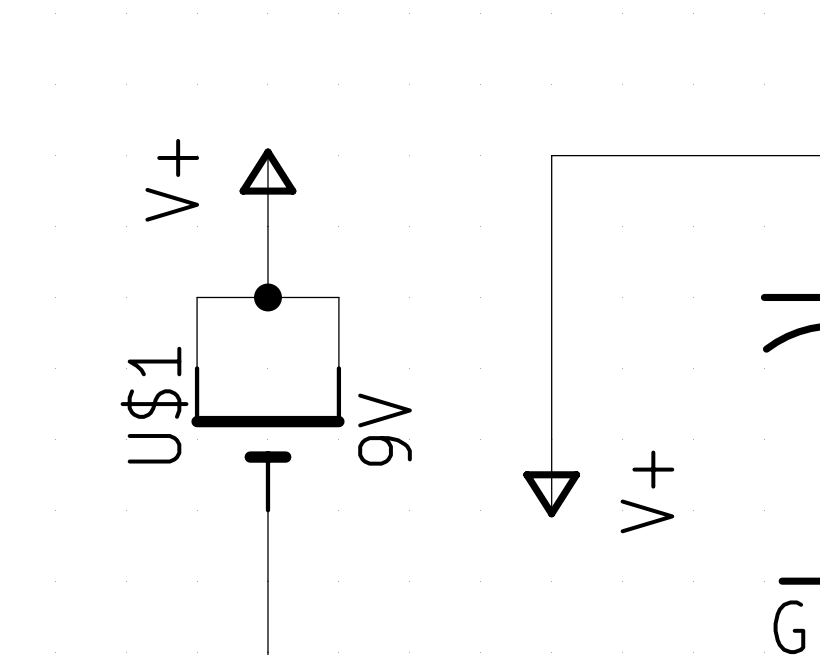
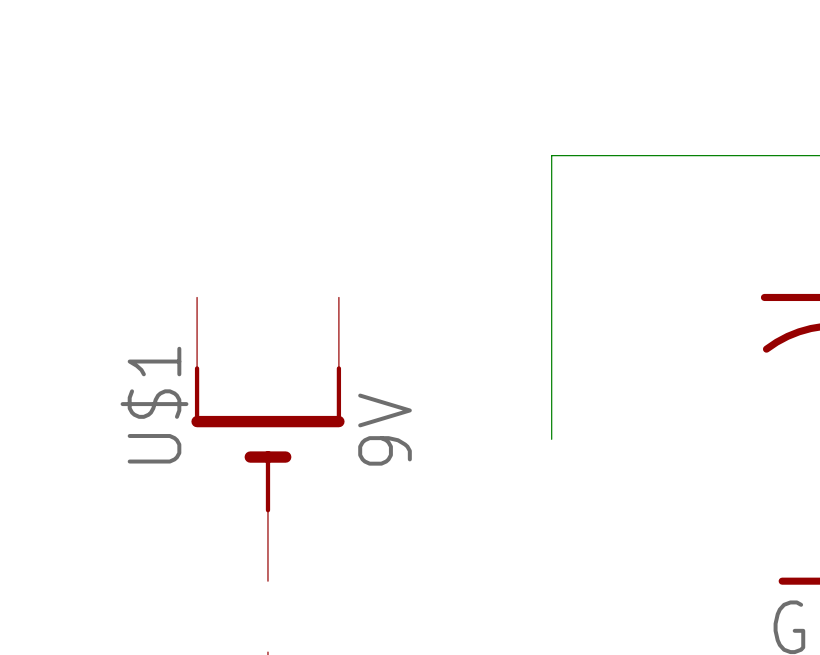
power symbol: V+ (267, 187) -> none
wire: (267, 226) (267, 297) -> none
wire: (197, 297) (338, 297) -> none
junction: (267, 297) -> none
power symbol: V+ (551, 478) -> none
wire: (267, 581) (267, 652) -> none

